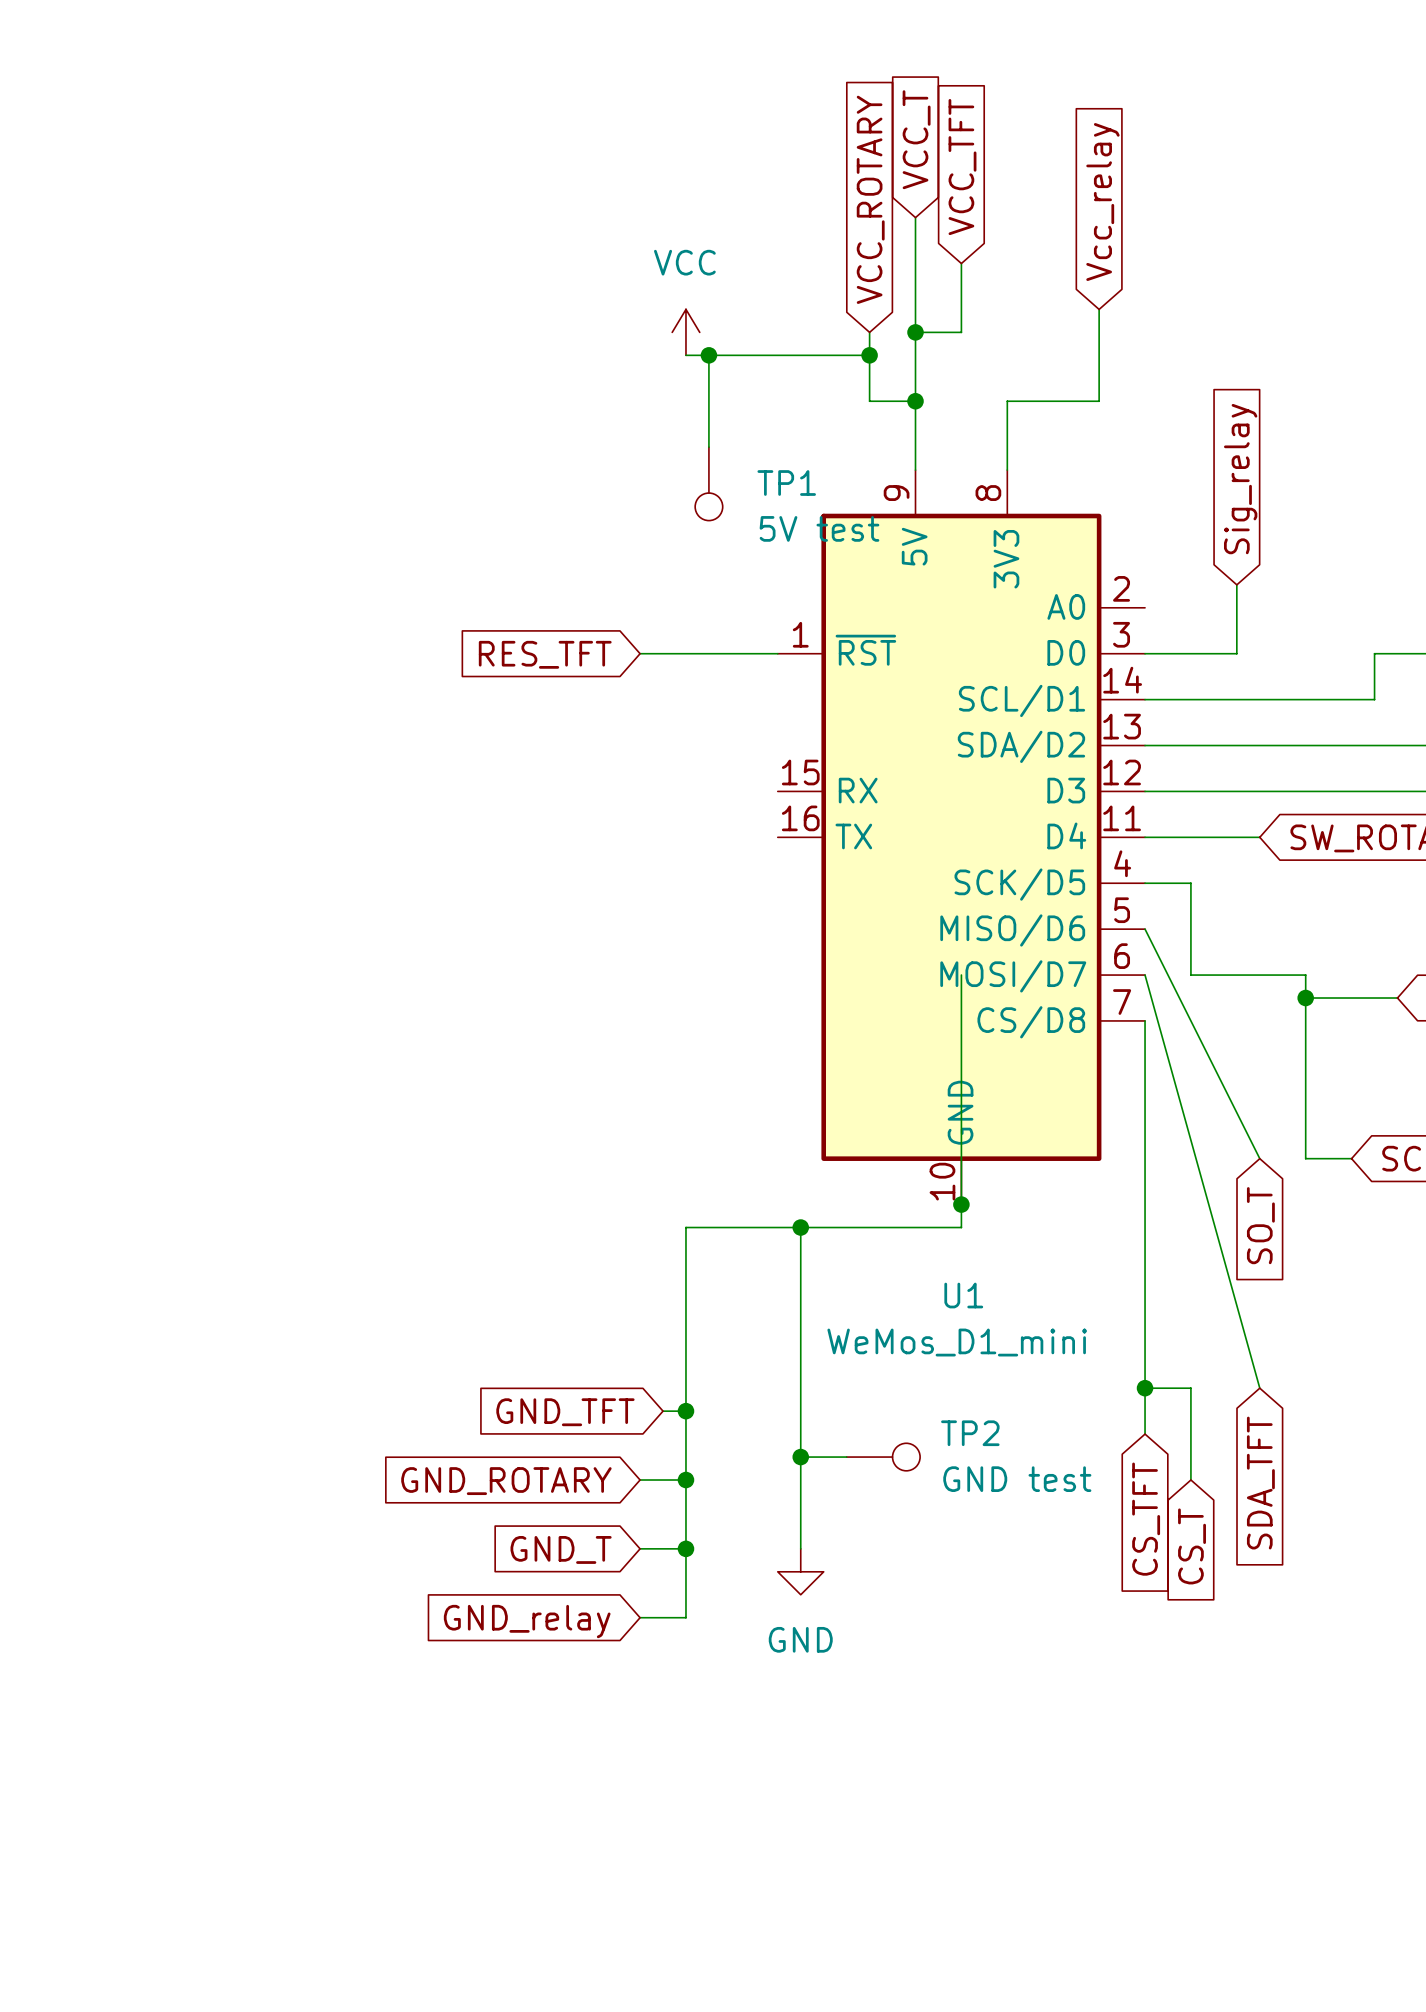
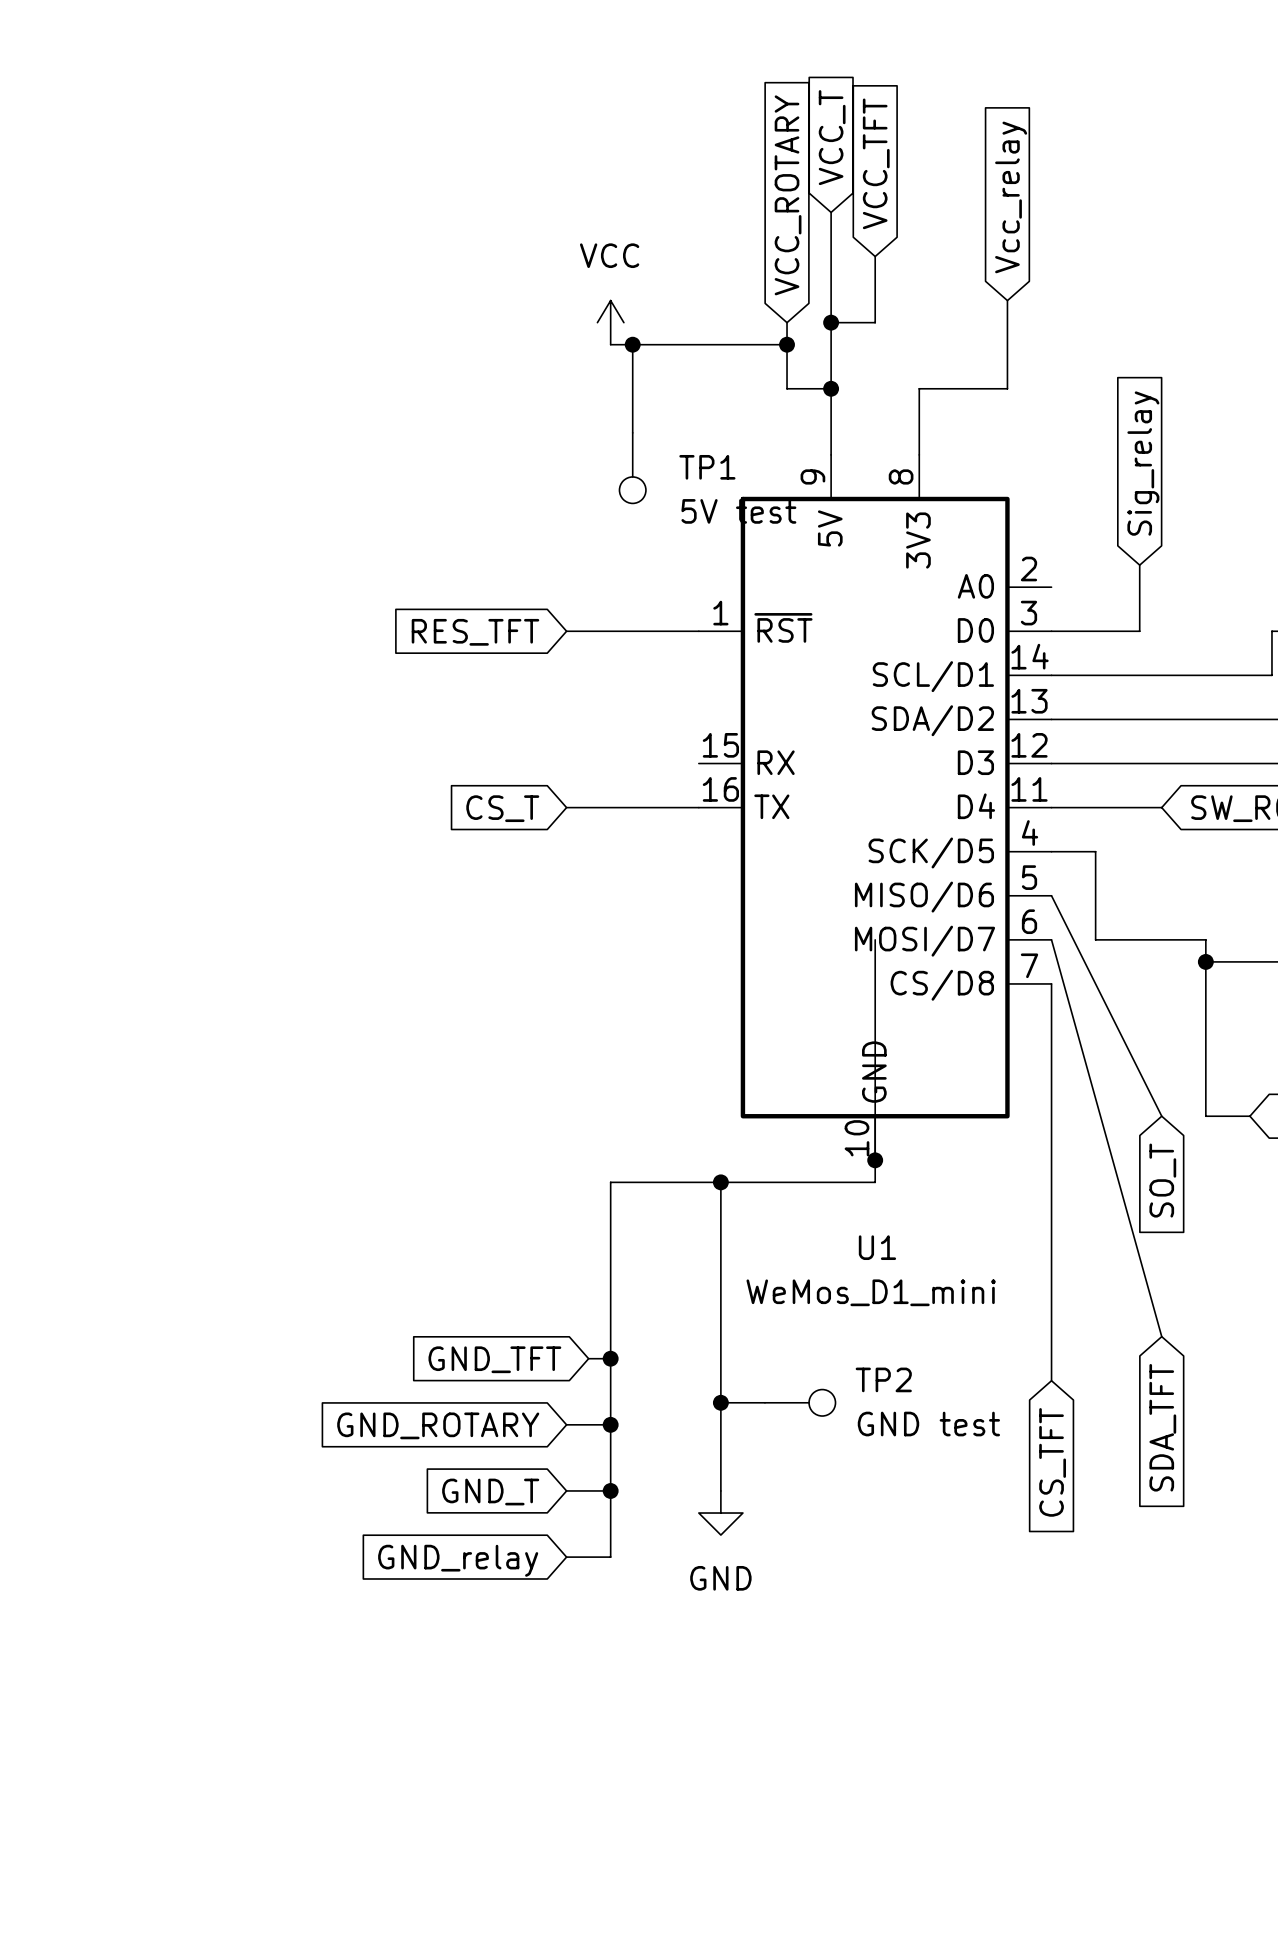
wire: none -> (566, 807) (698, 807)
global label: none -> CS_T (502, 808)
wire: (1145, 1388) (1190, 1388) (1190, 1480) -> none
junction: (1145, 1388) -> none
global label: CS_T (1192, 1546) -> none

